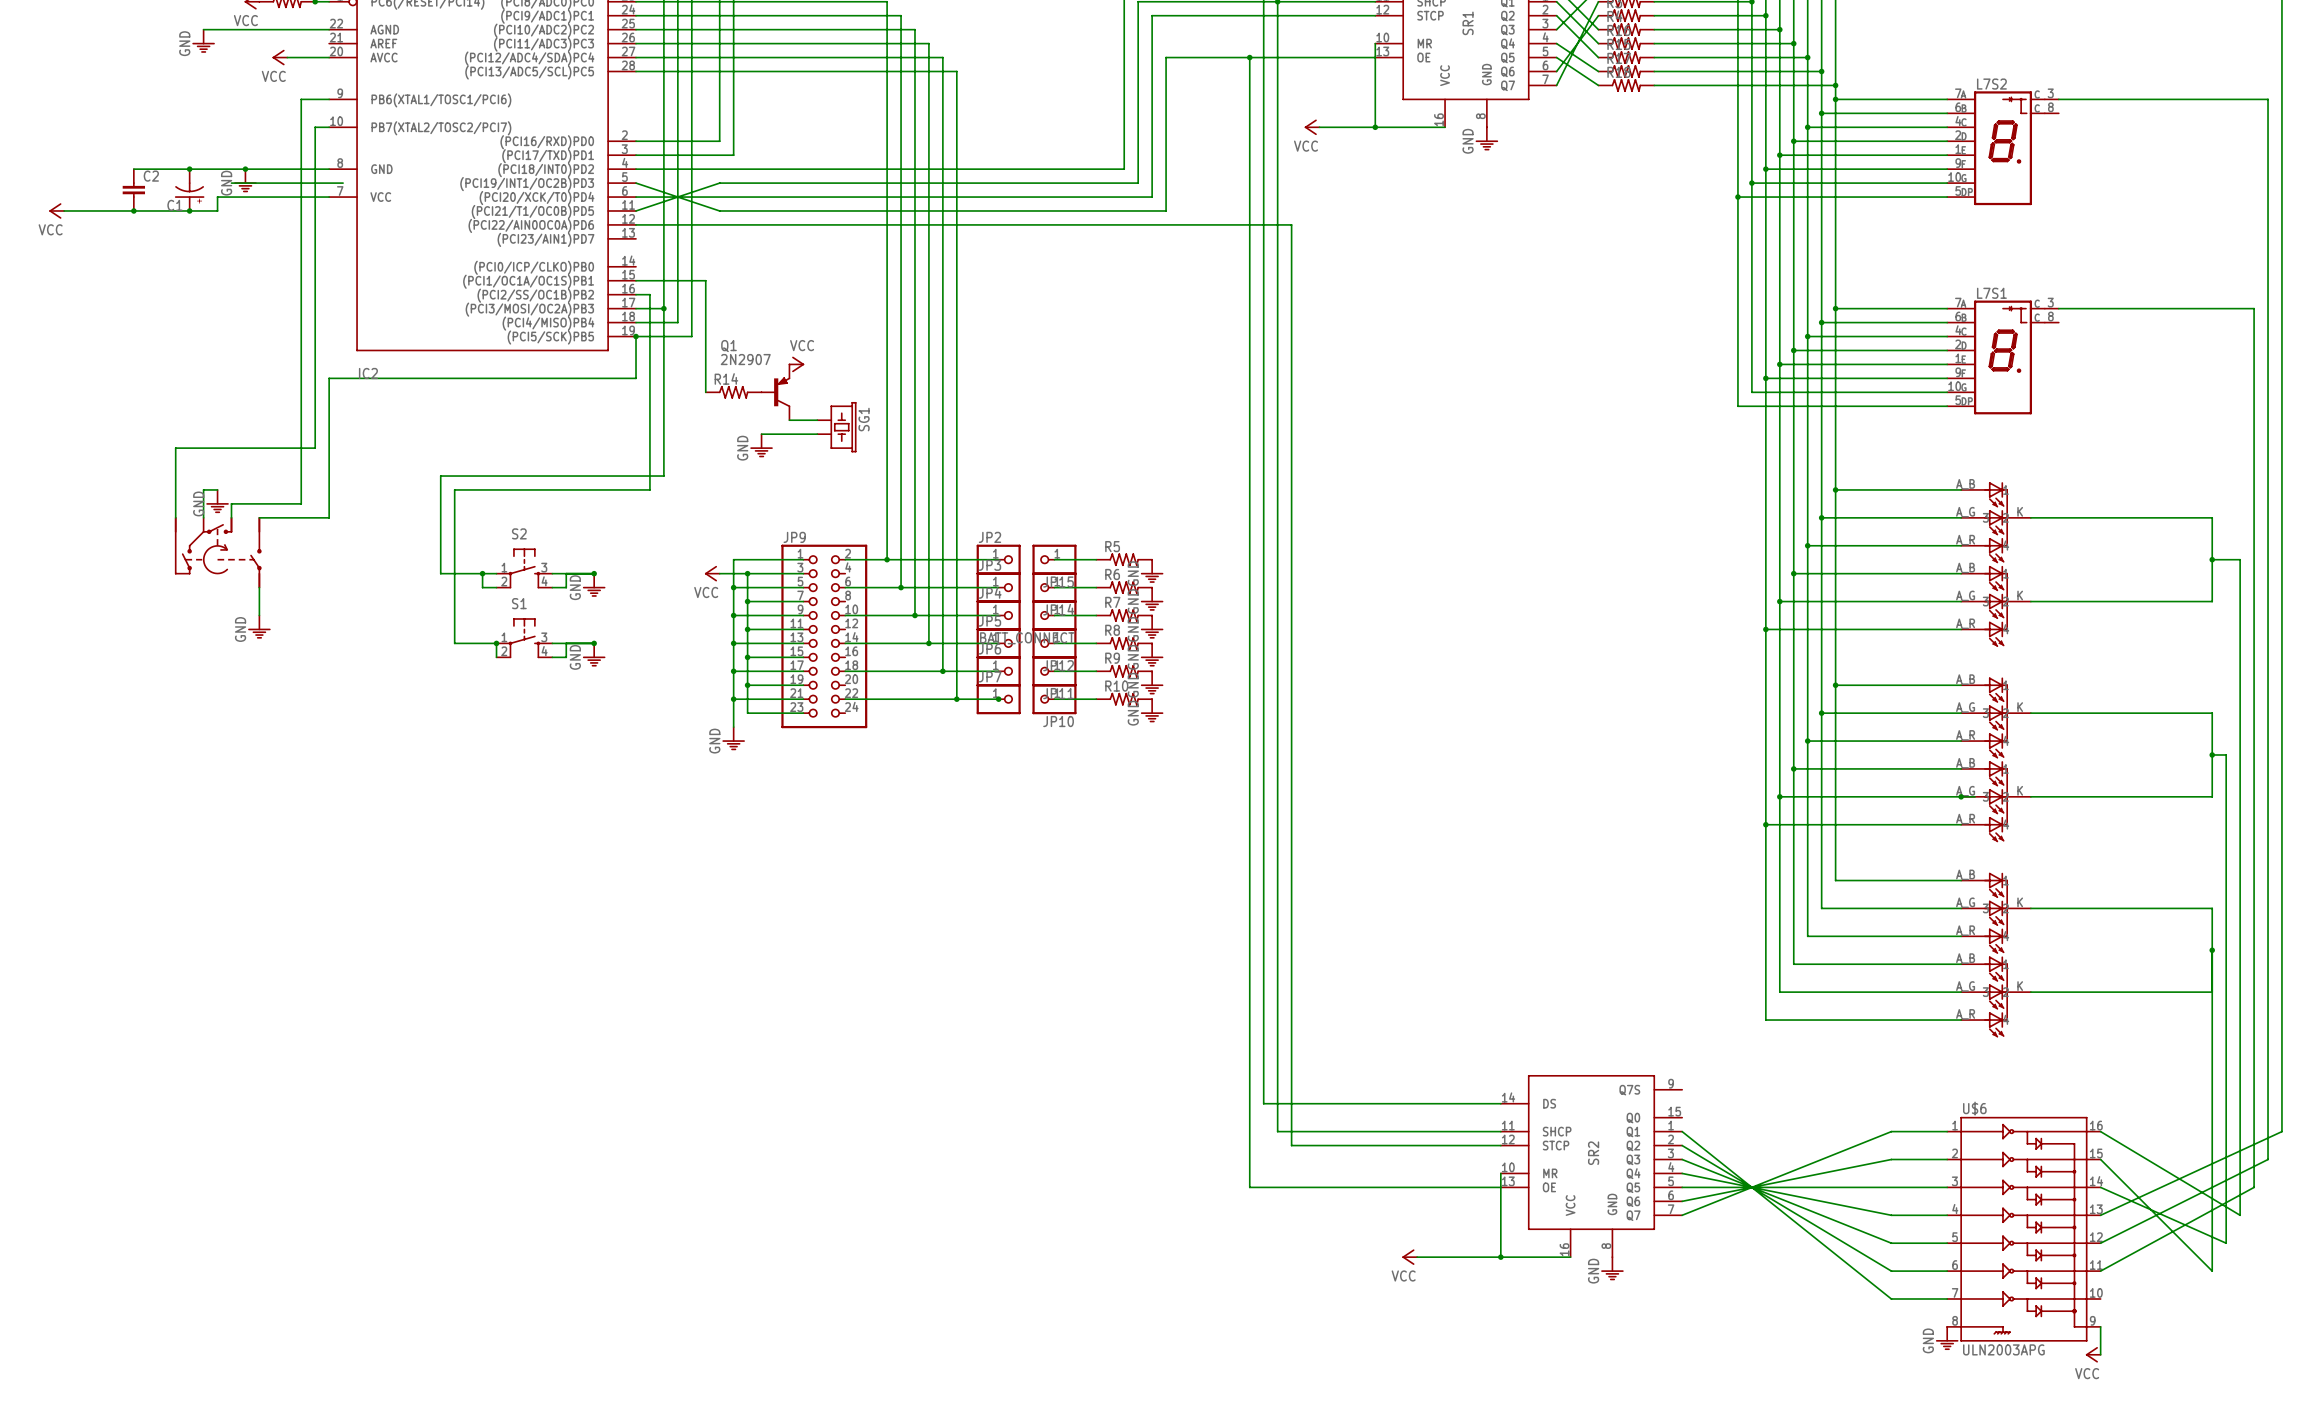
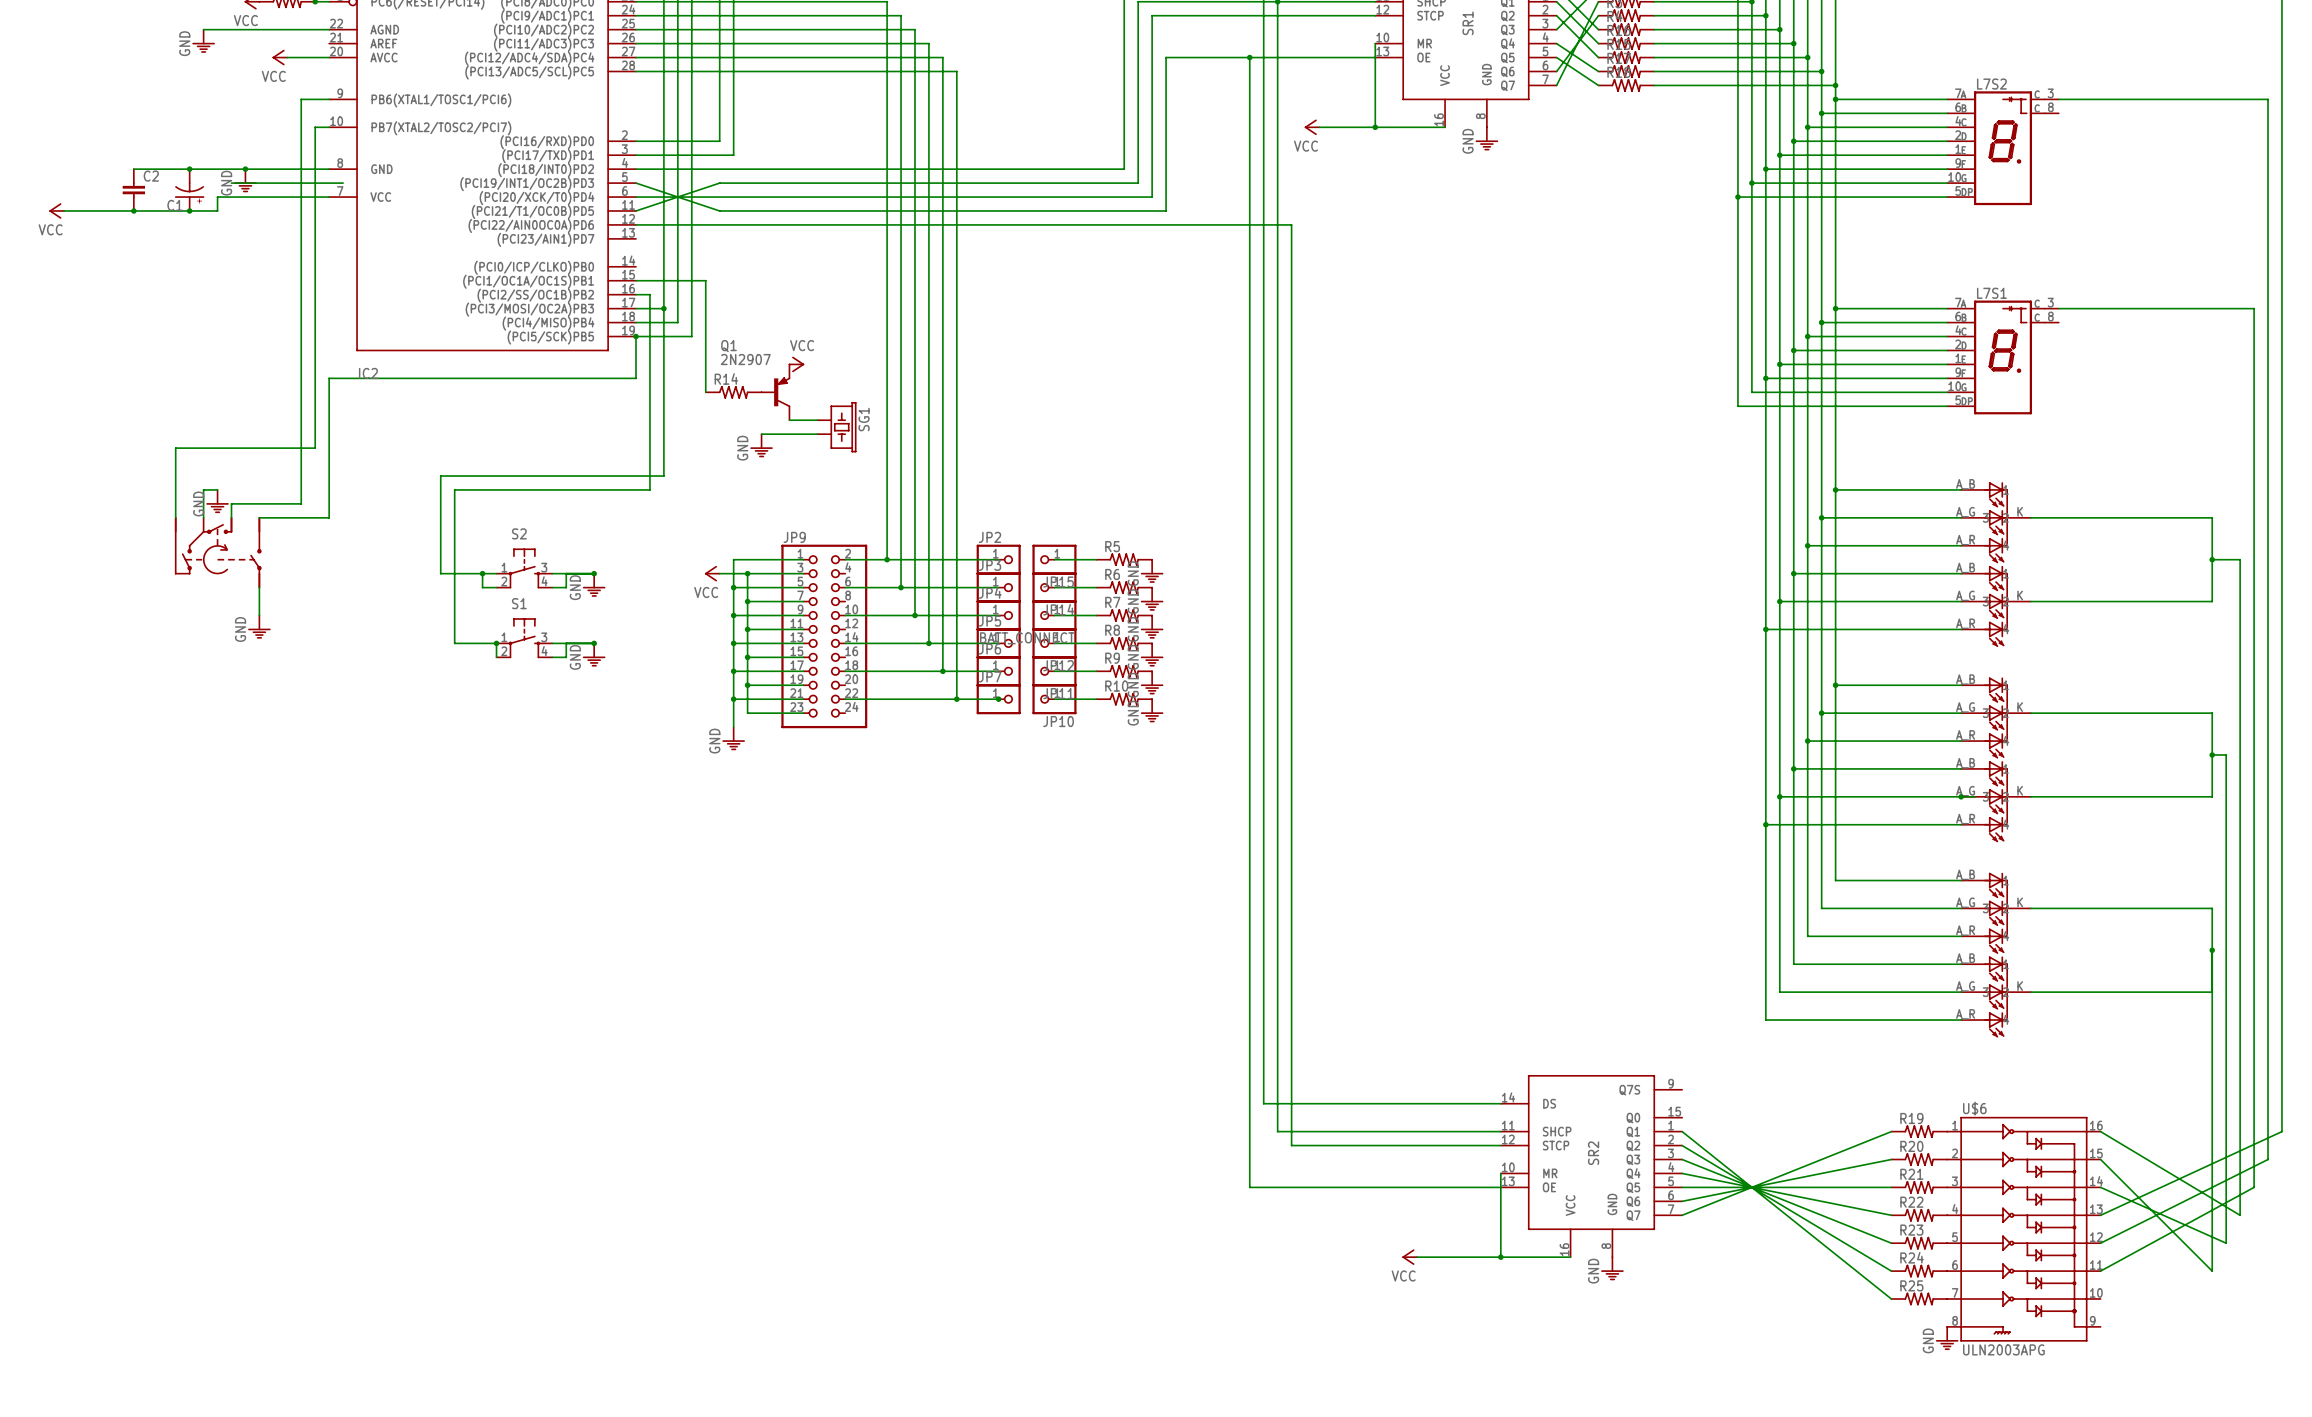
R19: none -> (1919, 1131)
R20: none -> (1919, 1159)
R21: none -> (1919, 1187)
R22: none -> (1919, 1215)
R23: none -> (1919, 1243)
R24: none -> (1919, 1271)
R25: none -> (1919, 1298)
wire: (2100, 1326) (2100, 1354) -> none
power symbol: VCC (2093, 1354) -> none

